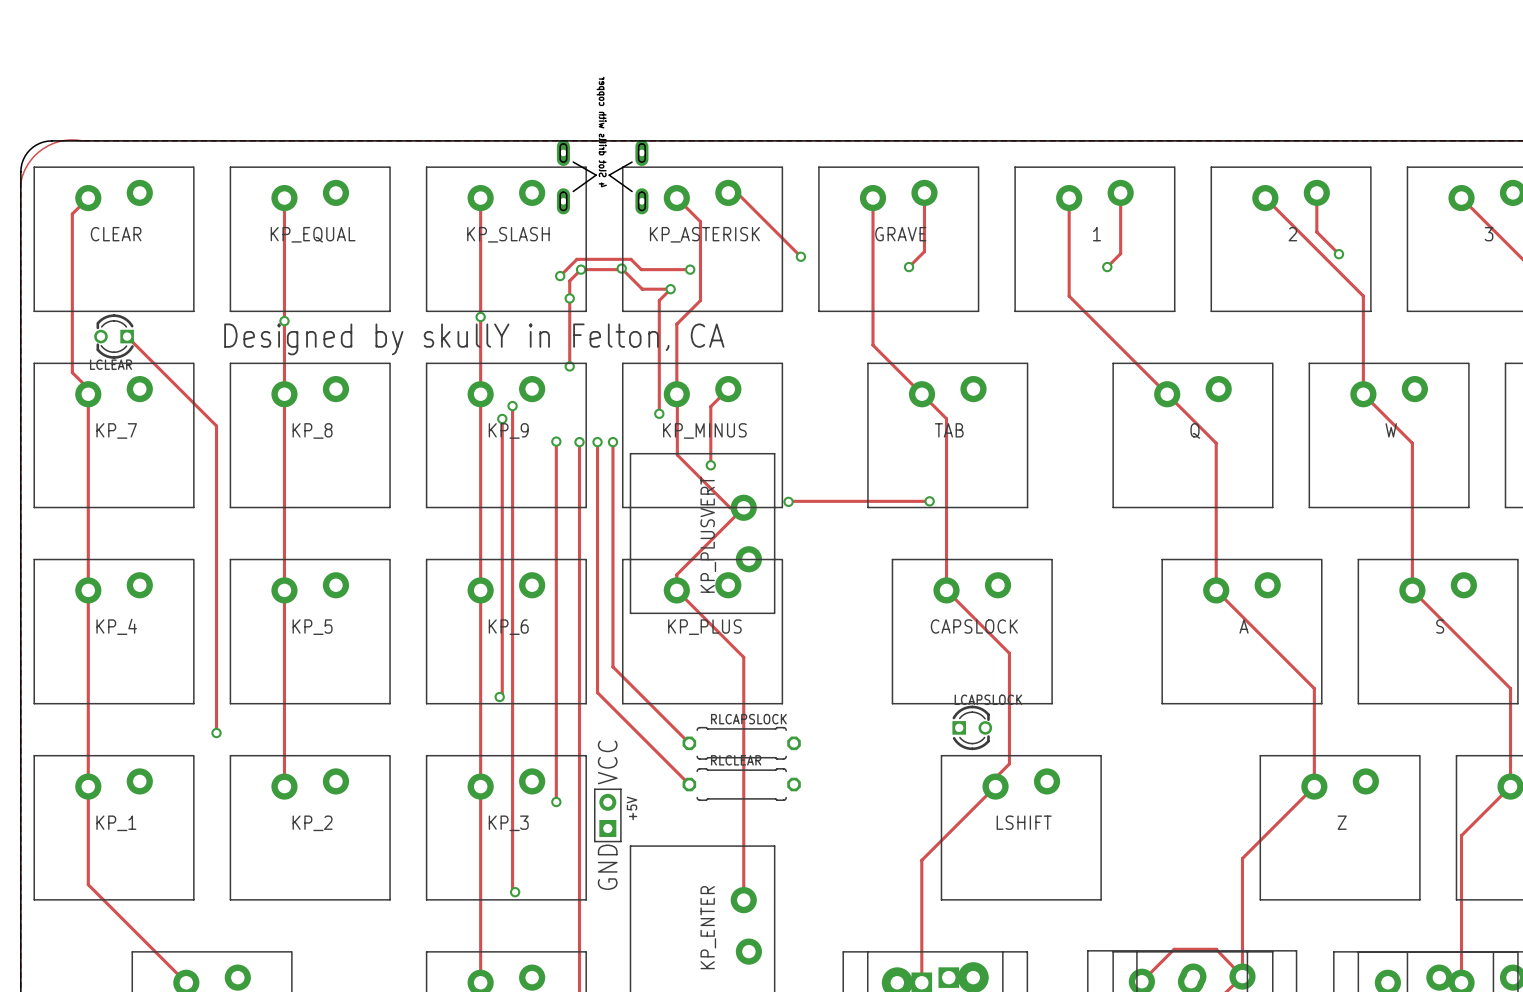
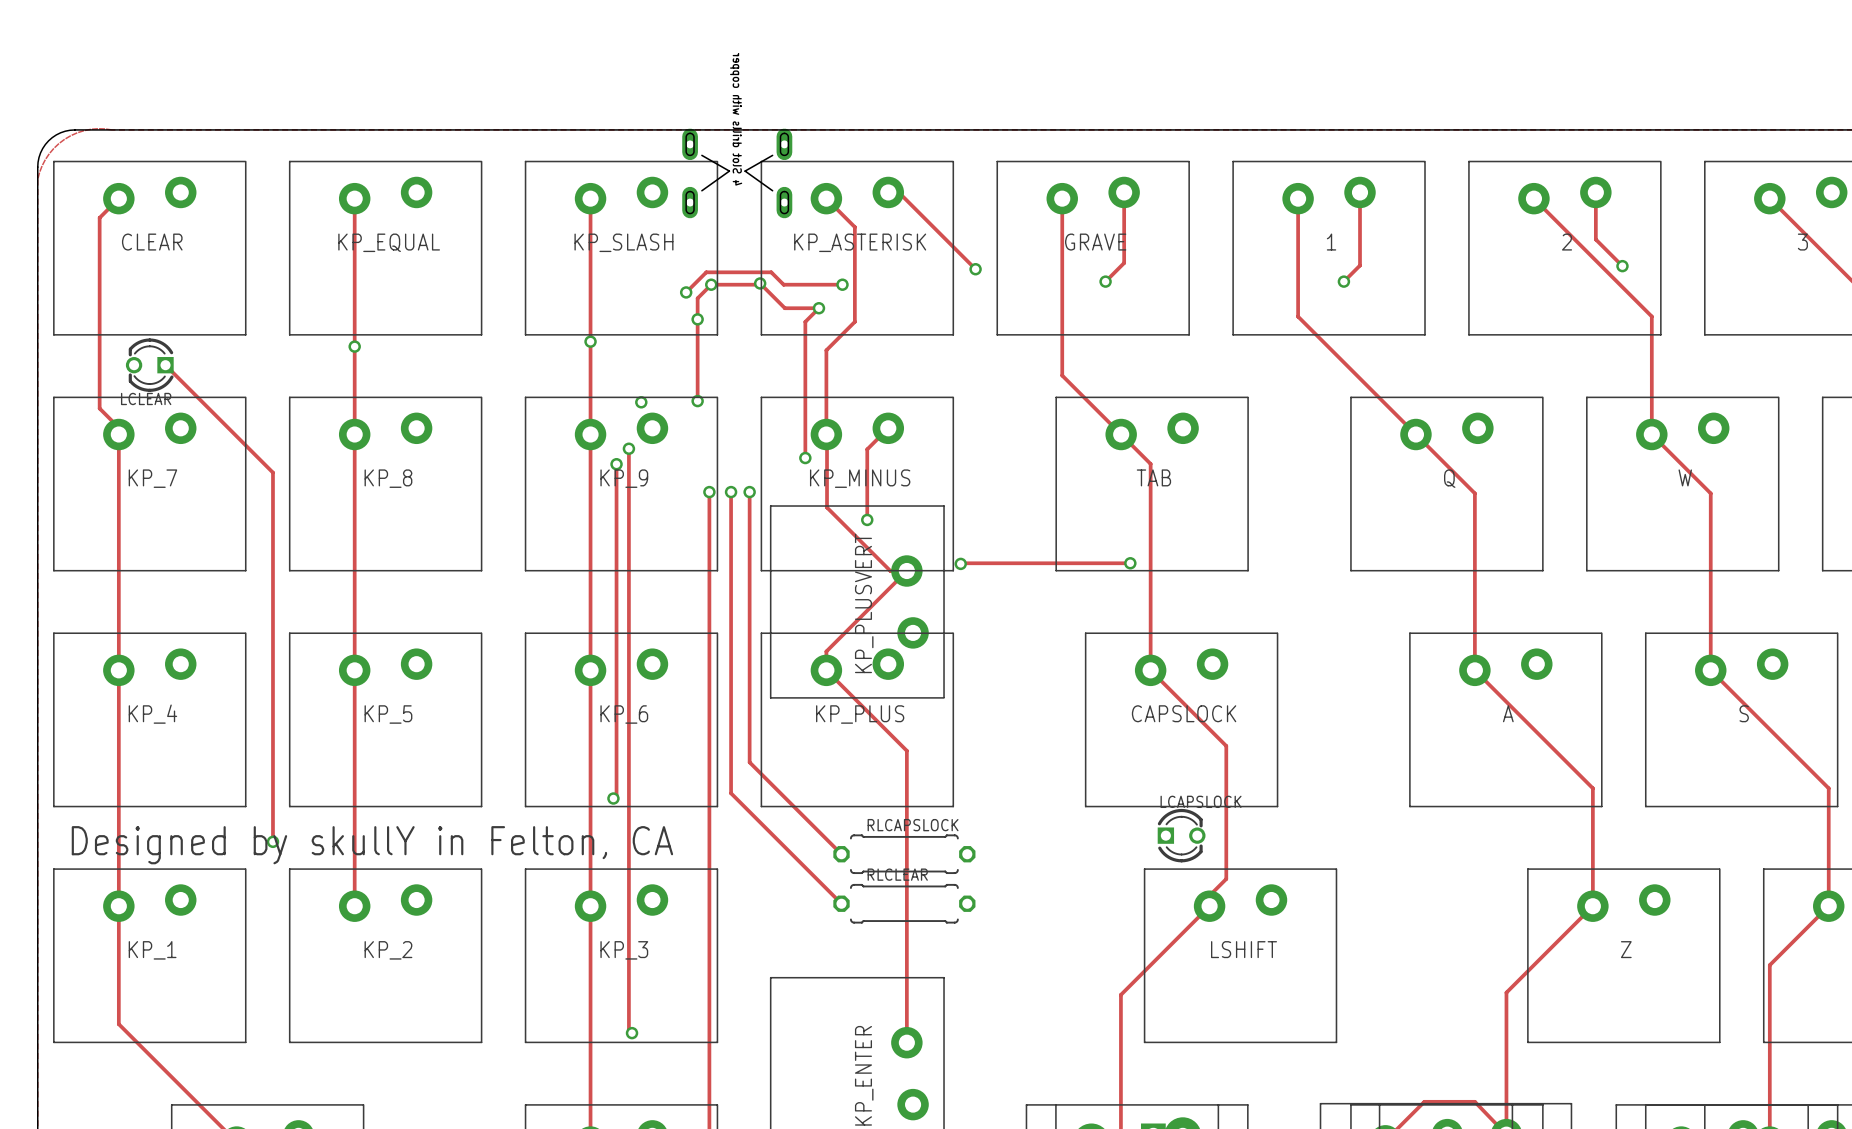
text: Designed by skullY in Felton, CA (474, 339) -> none
via: none -> (641, 402)
track: (556, 441) (556, 802) -> none
via: (556, 441) -> none
text: none -> Designed by skullY in Felton, CA (372, 845)
text: VCC (607, 762) -> none
via: (556, 802) -> none
+5V: (607, 815) -> none
text: GND (607, 867) -> none

